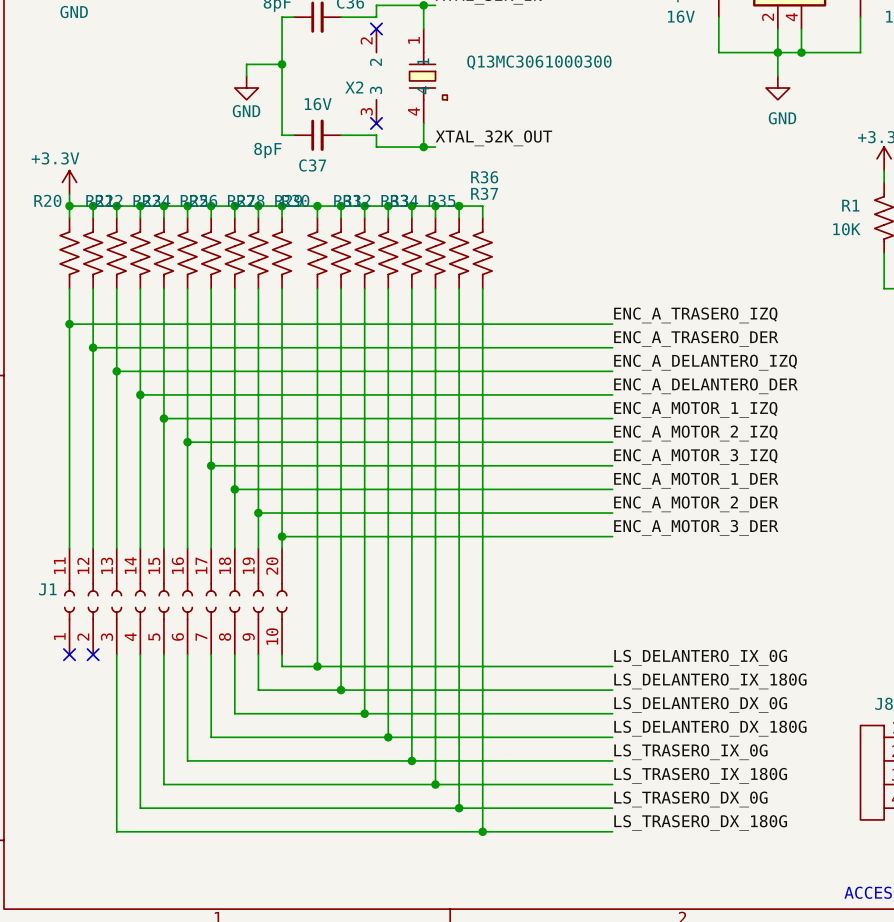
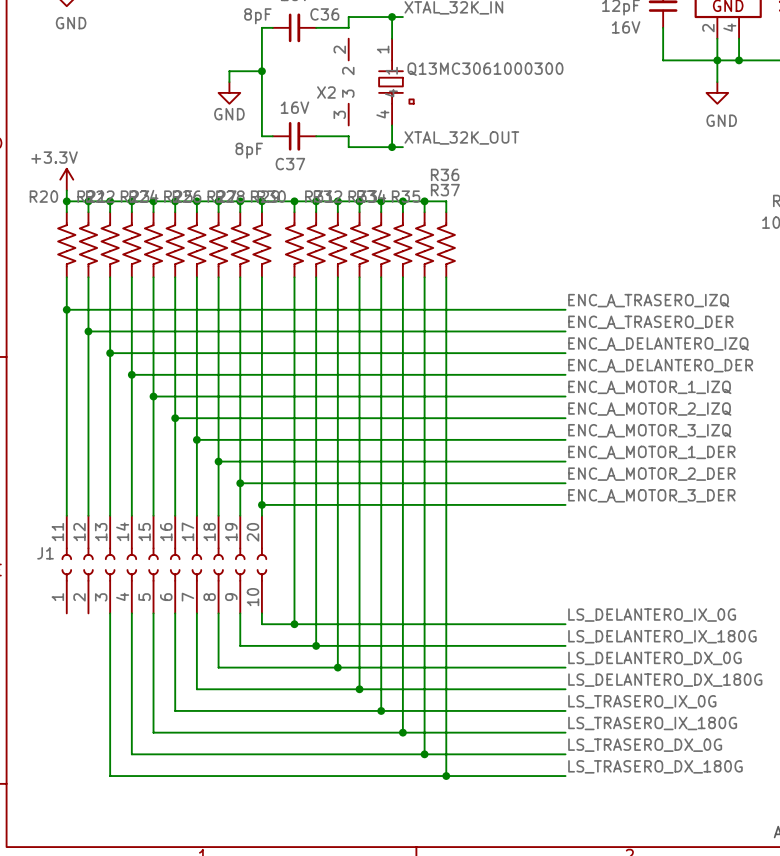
no-connect mark: (376, 28) -> none
no-connect mark: (376, 123) -> none
no-connect mark: (69, 654) -> none
no-connect mark: (93, 654) -> none

